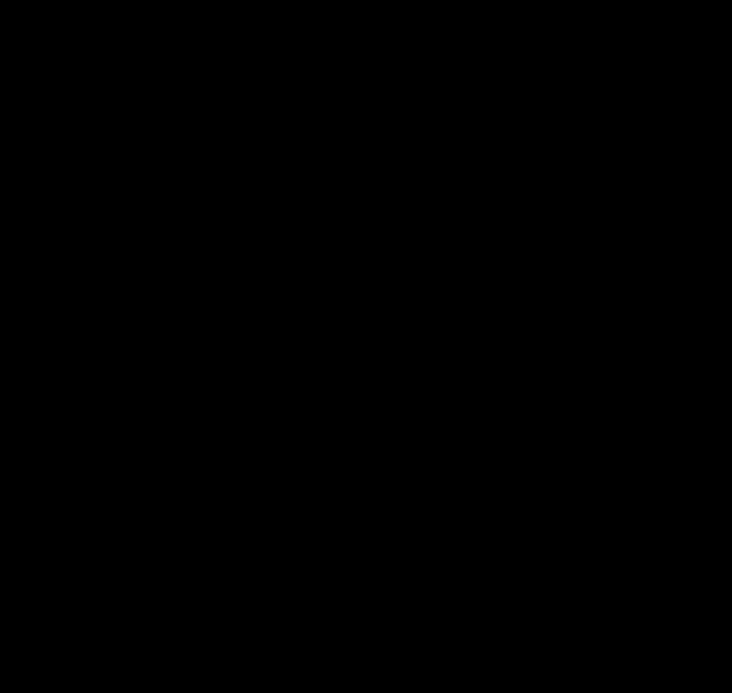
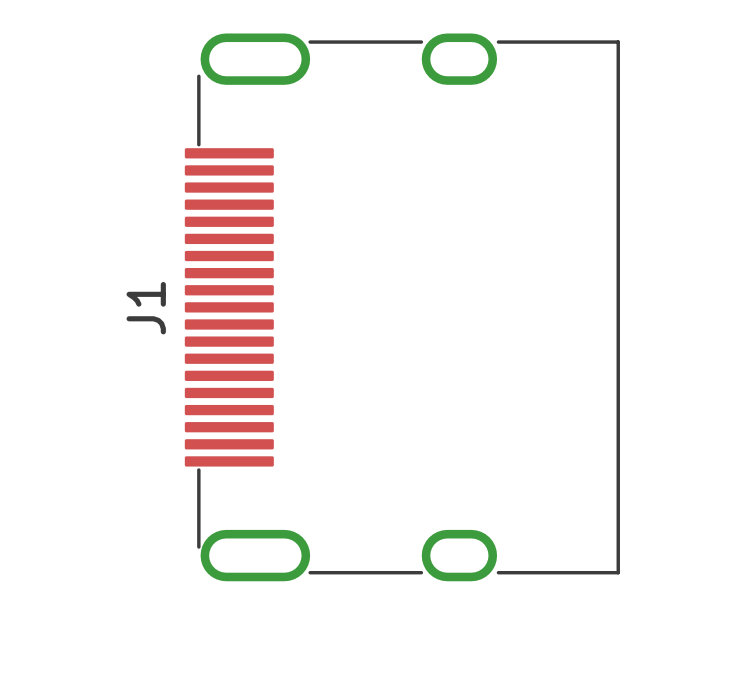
J1: none -> (402, 307)

